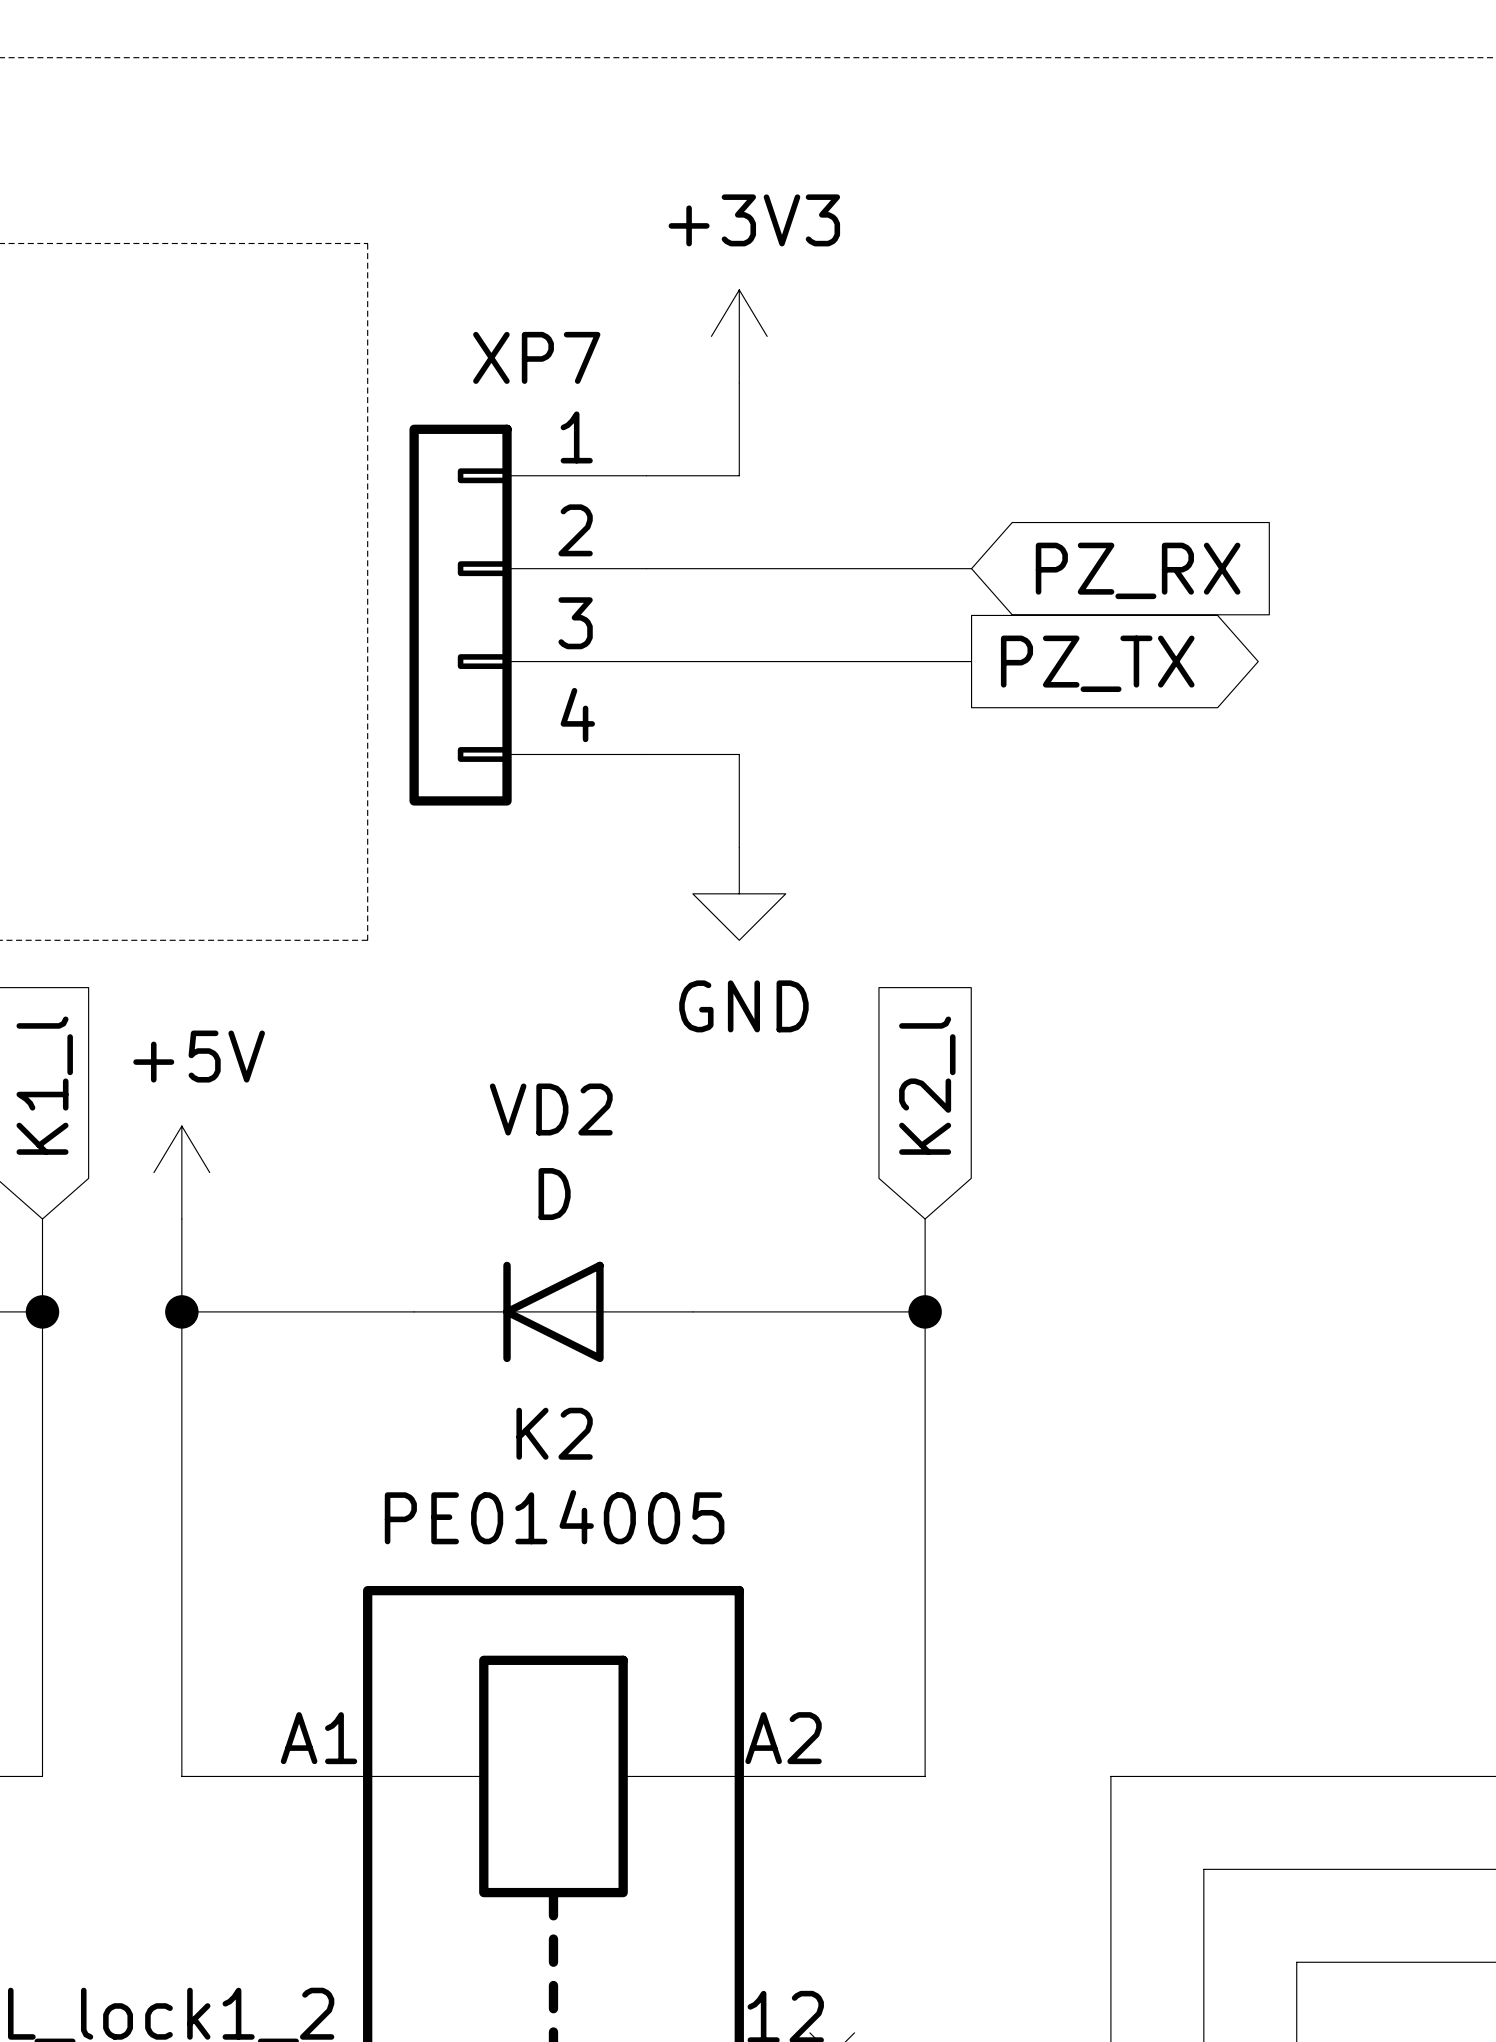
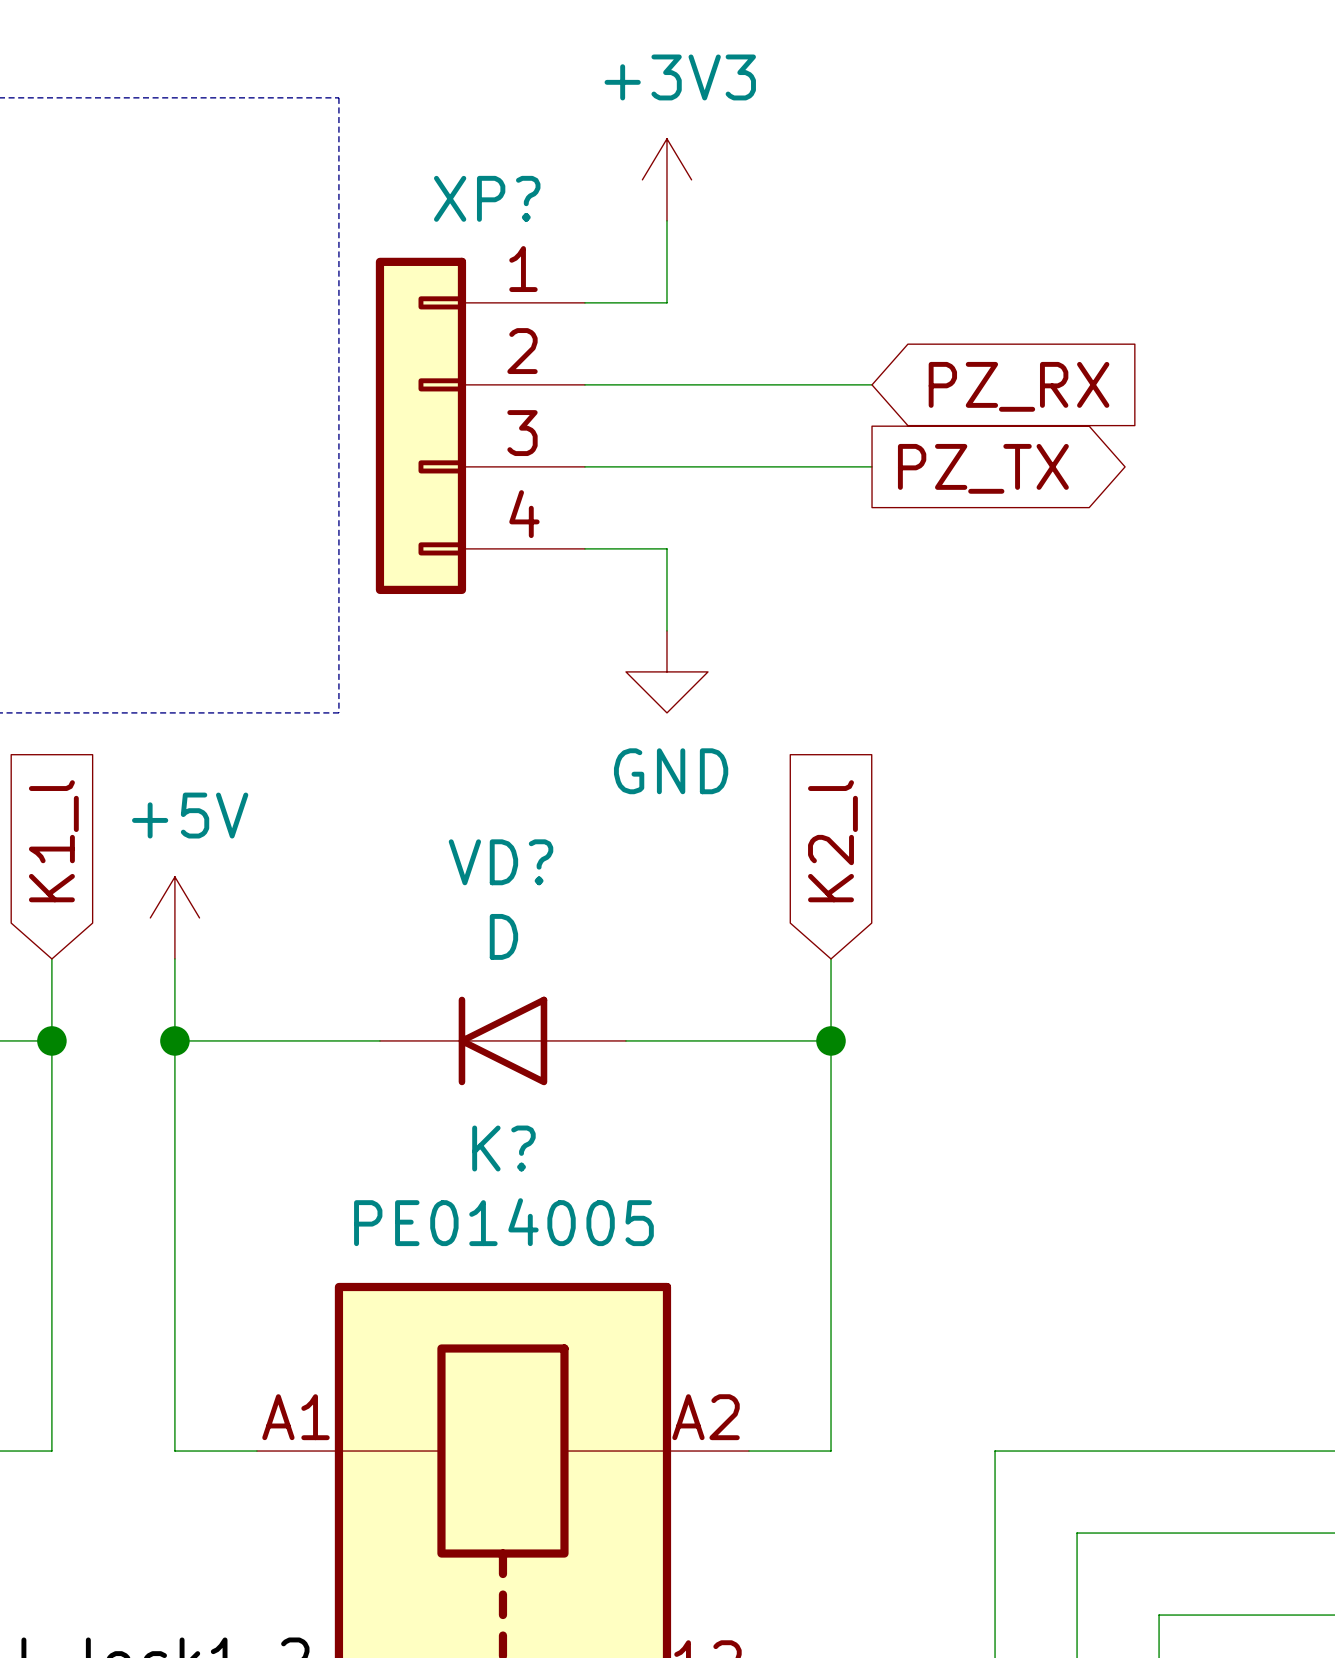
XP7 name: XP7 (536, 357) -> XP? (487, 198)
VD2 name: VD2 (551, 1109) -> VD? (501, 862)
K2 name: K2 (554, 1433) -> K? (503, 1148)

